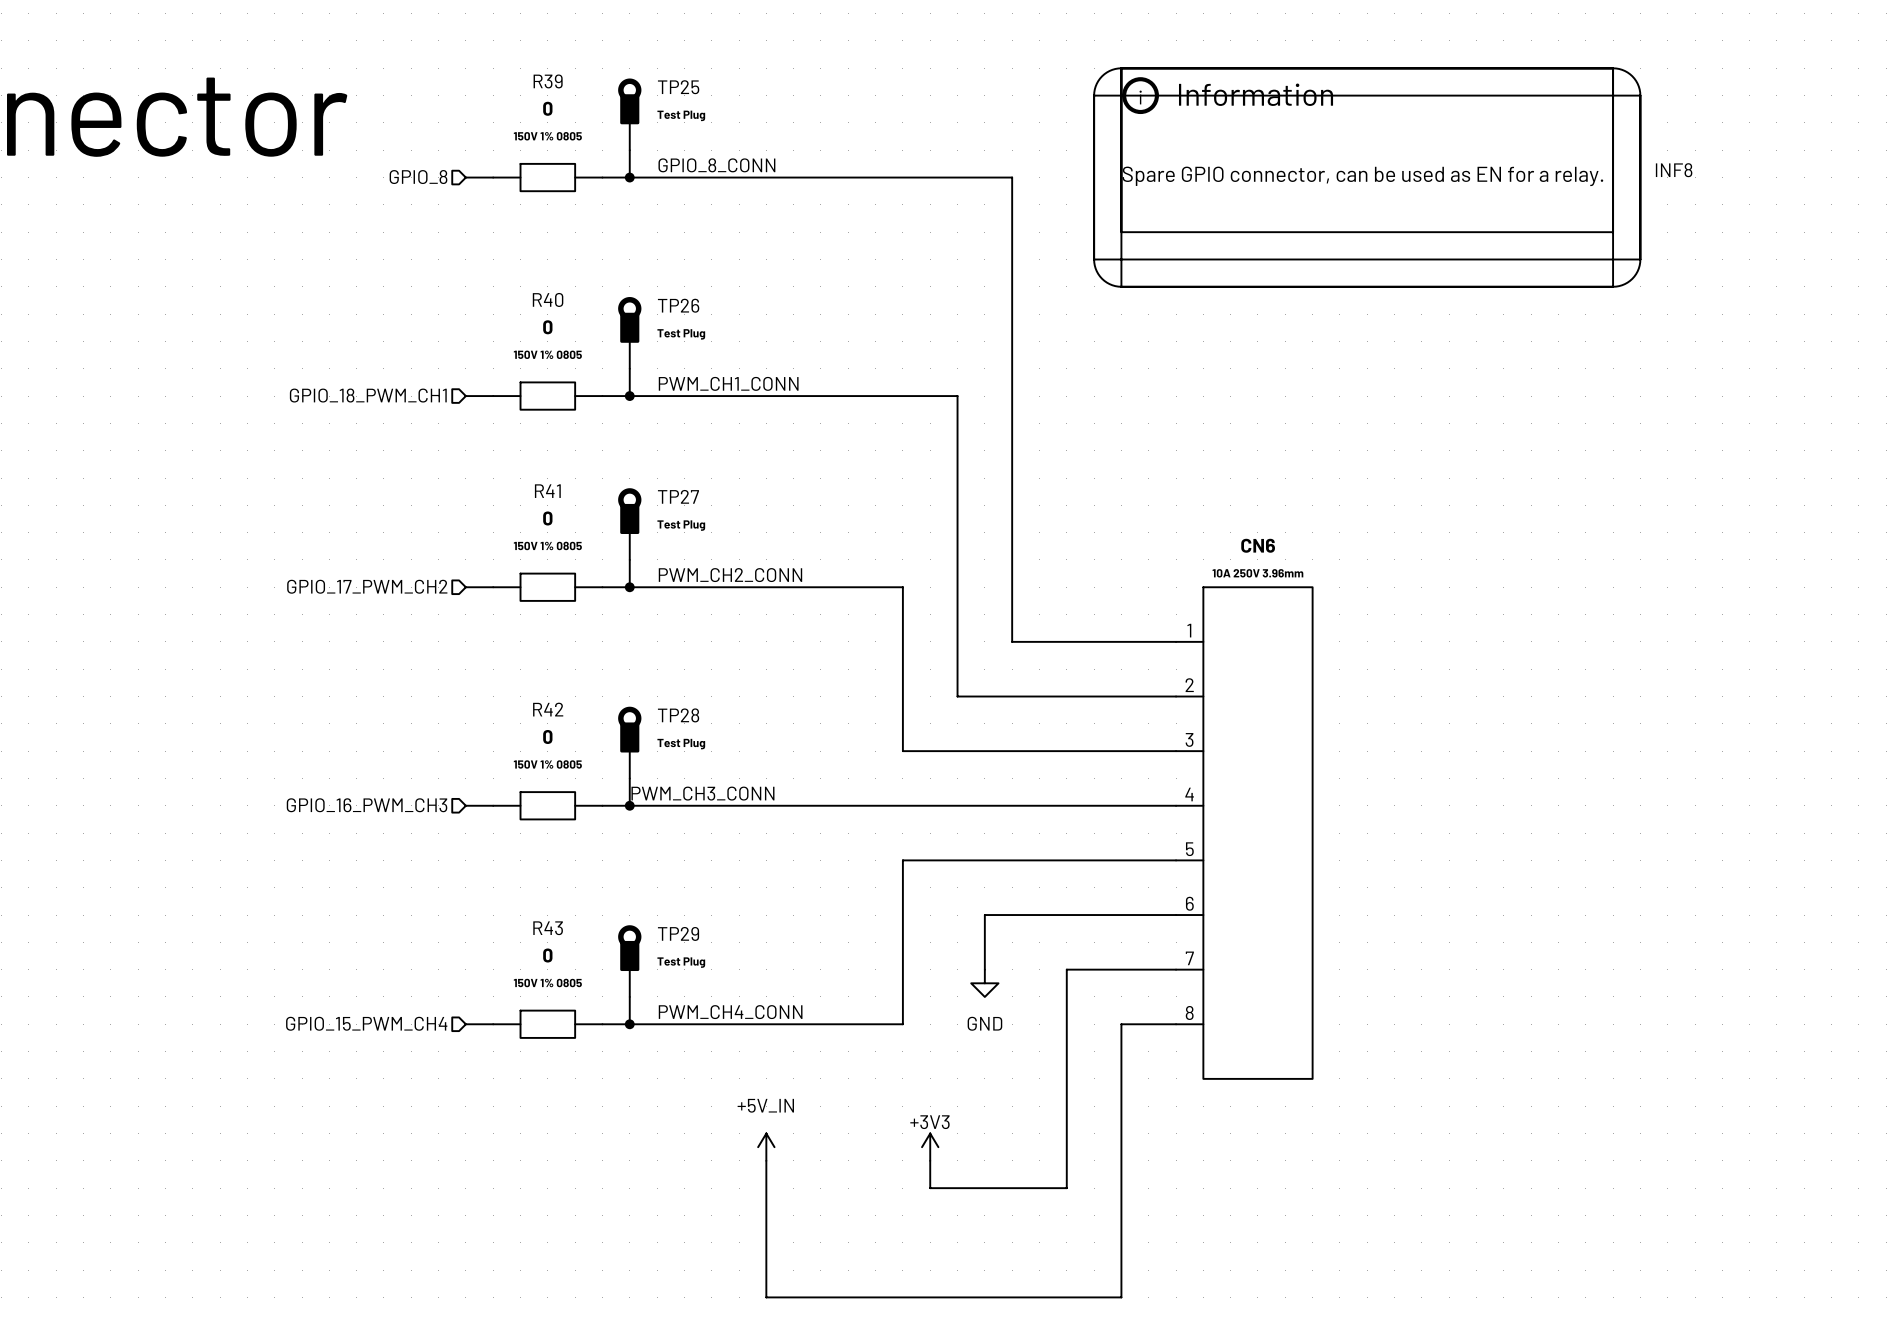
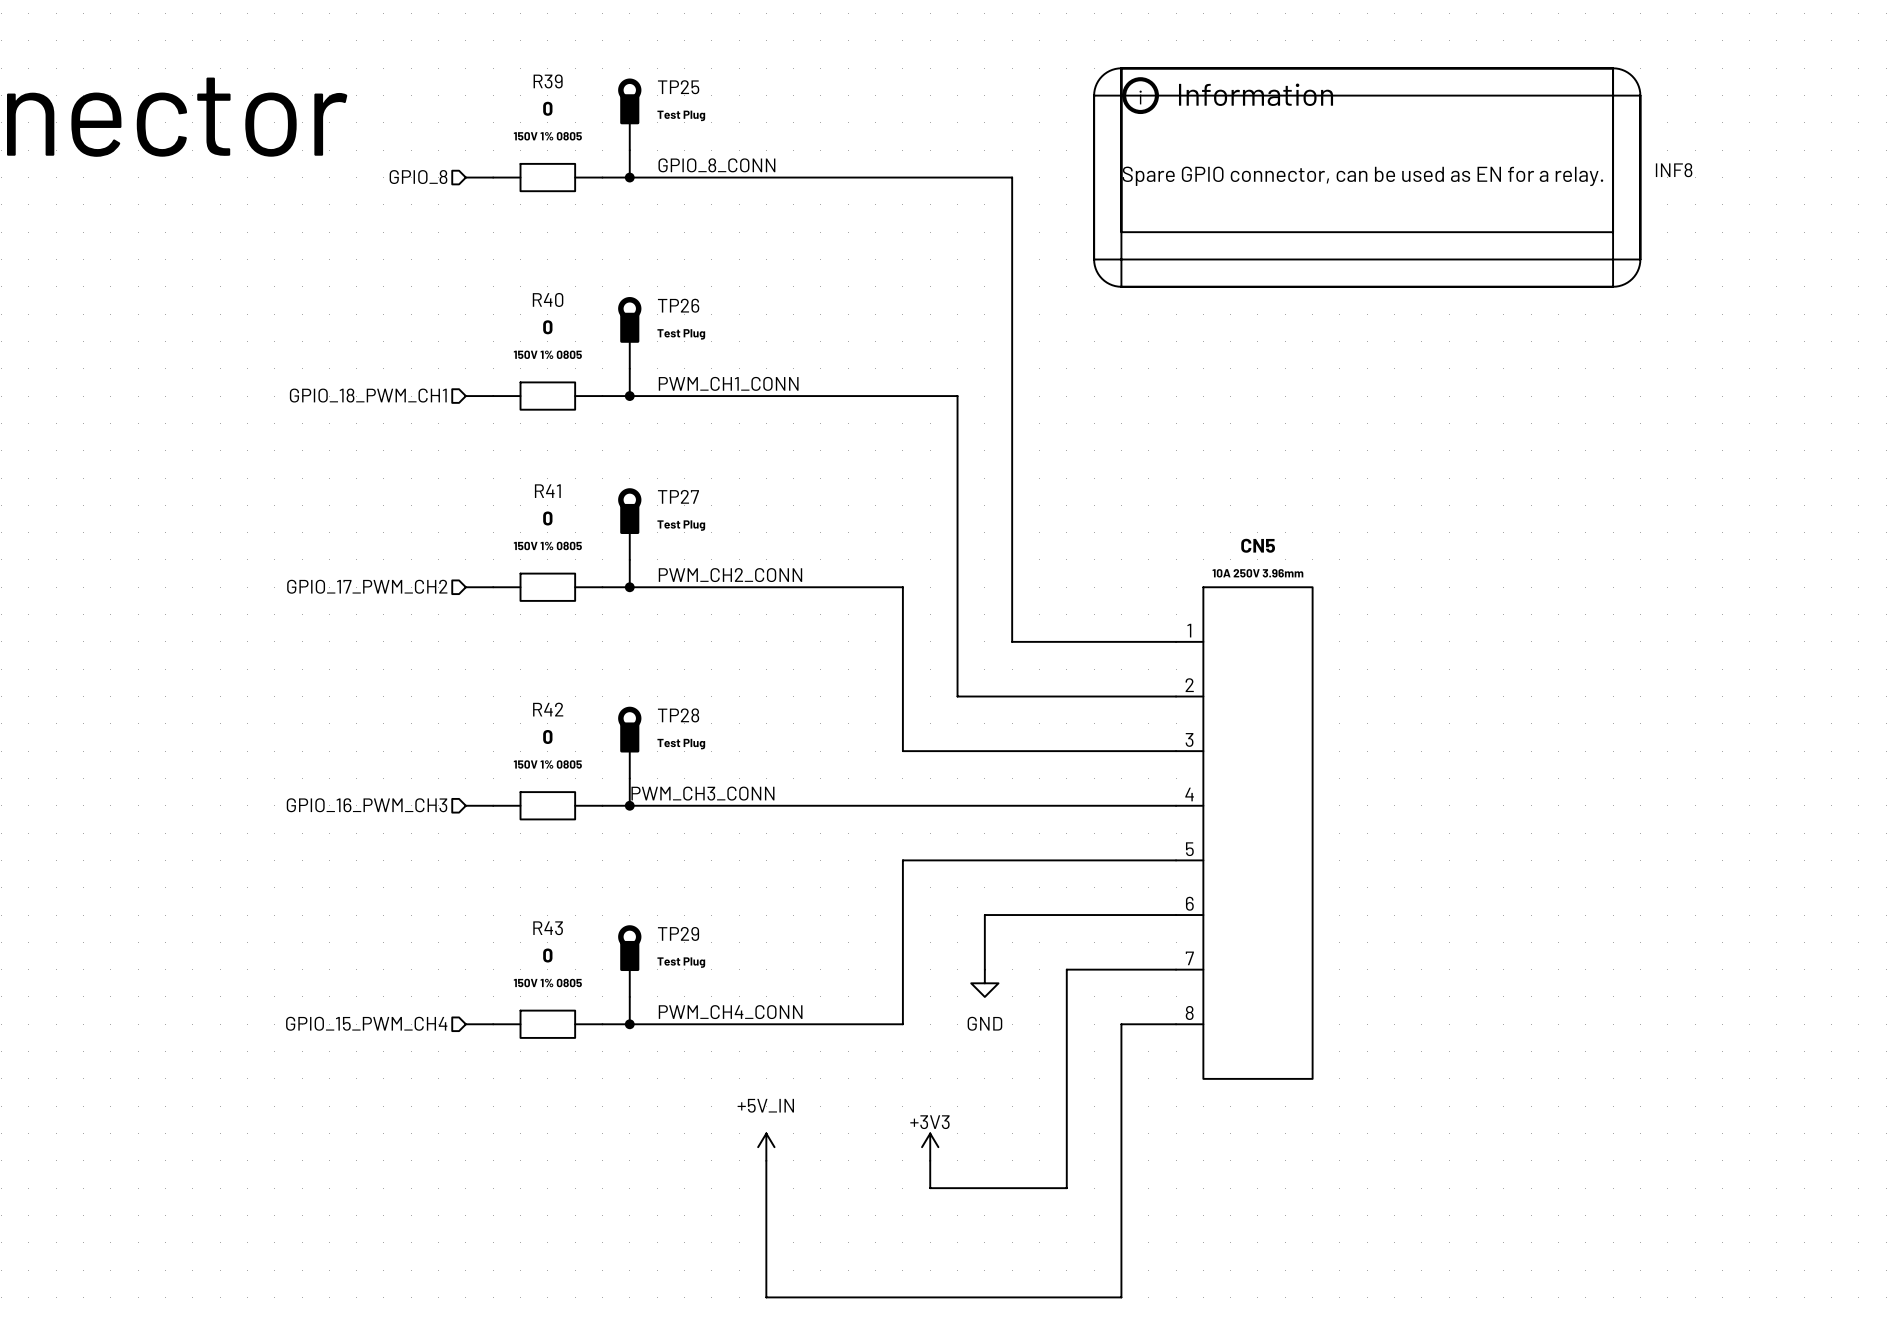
CN6 name: CN6 (1258, 545) -> CN5 (1258, 545)

